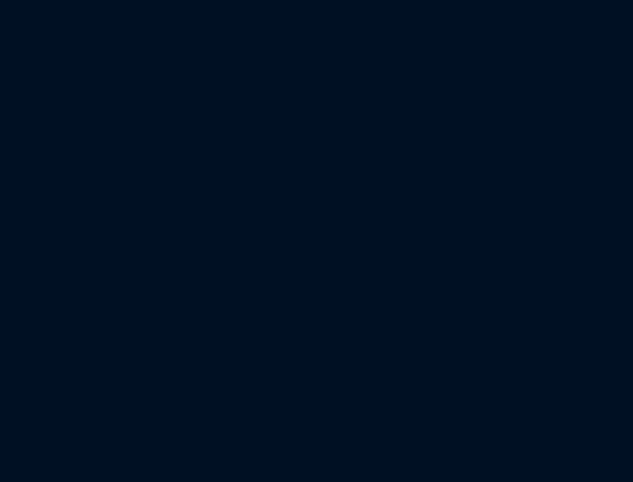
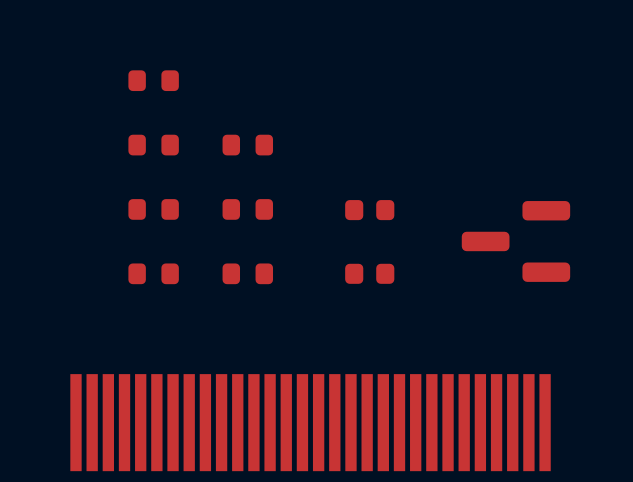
part: none -> (153, 80)
part: none -> (153, 145)
part: none -> (247, 145)
part: none -> (153, 209)
part: none -> (247, 209)
part: none -> (369, 210)
part: none -> (515, 241)
part: none -> (153, 273)
part: none -> (247, 273)
part: none -> (369, 273)
part: none -> (310, 422)

